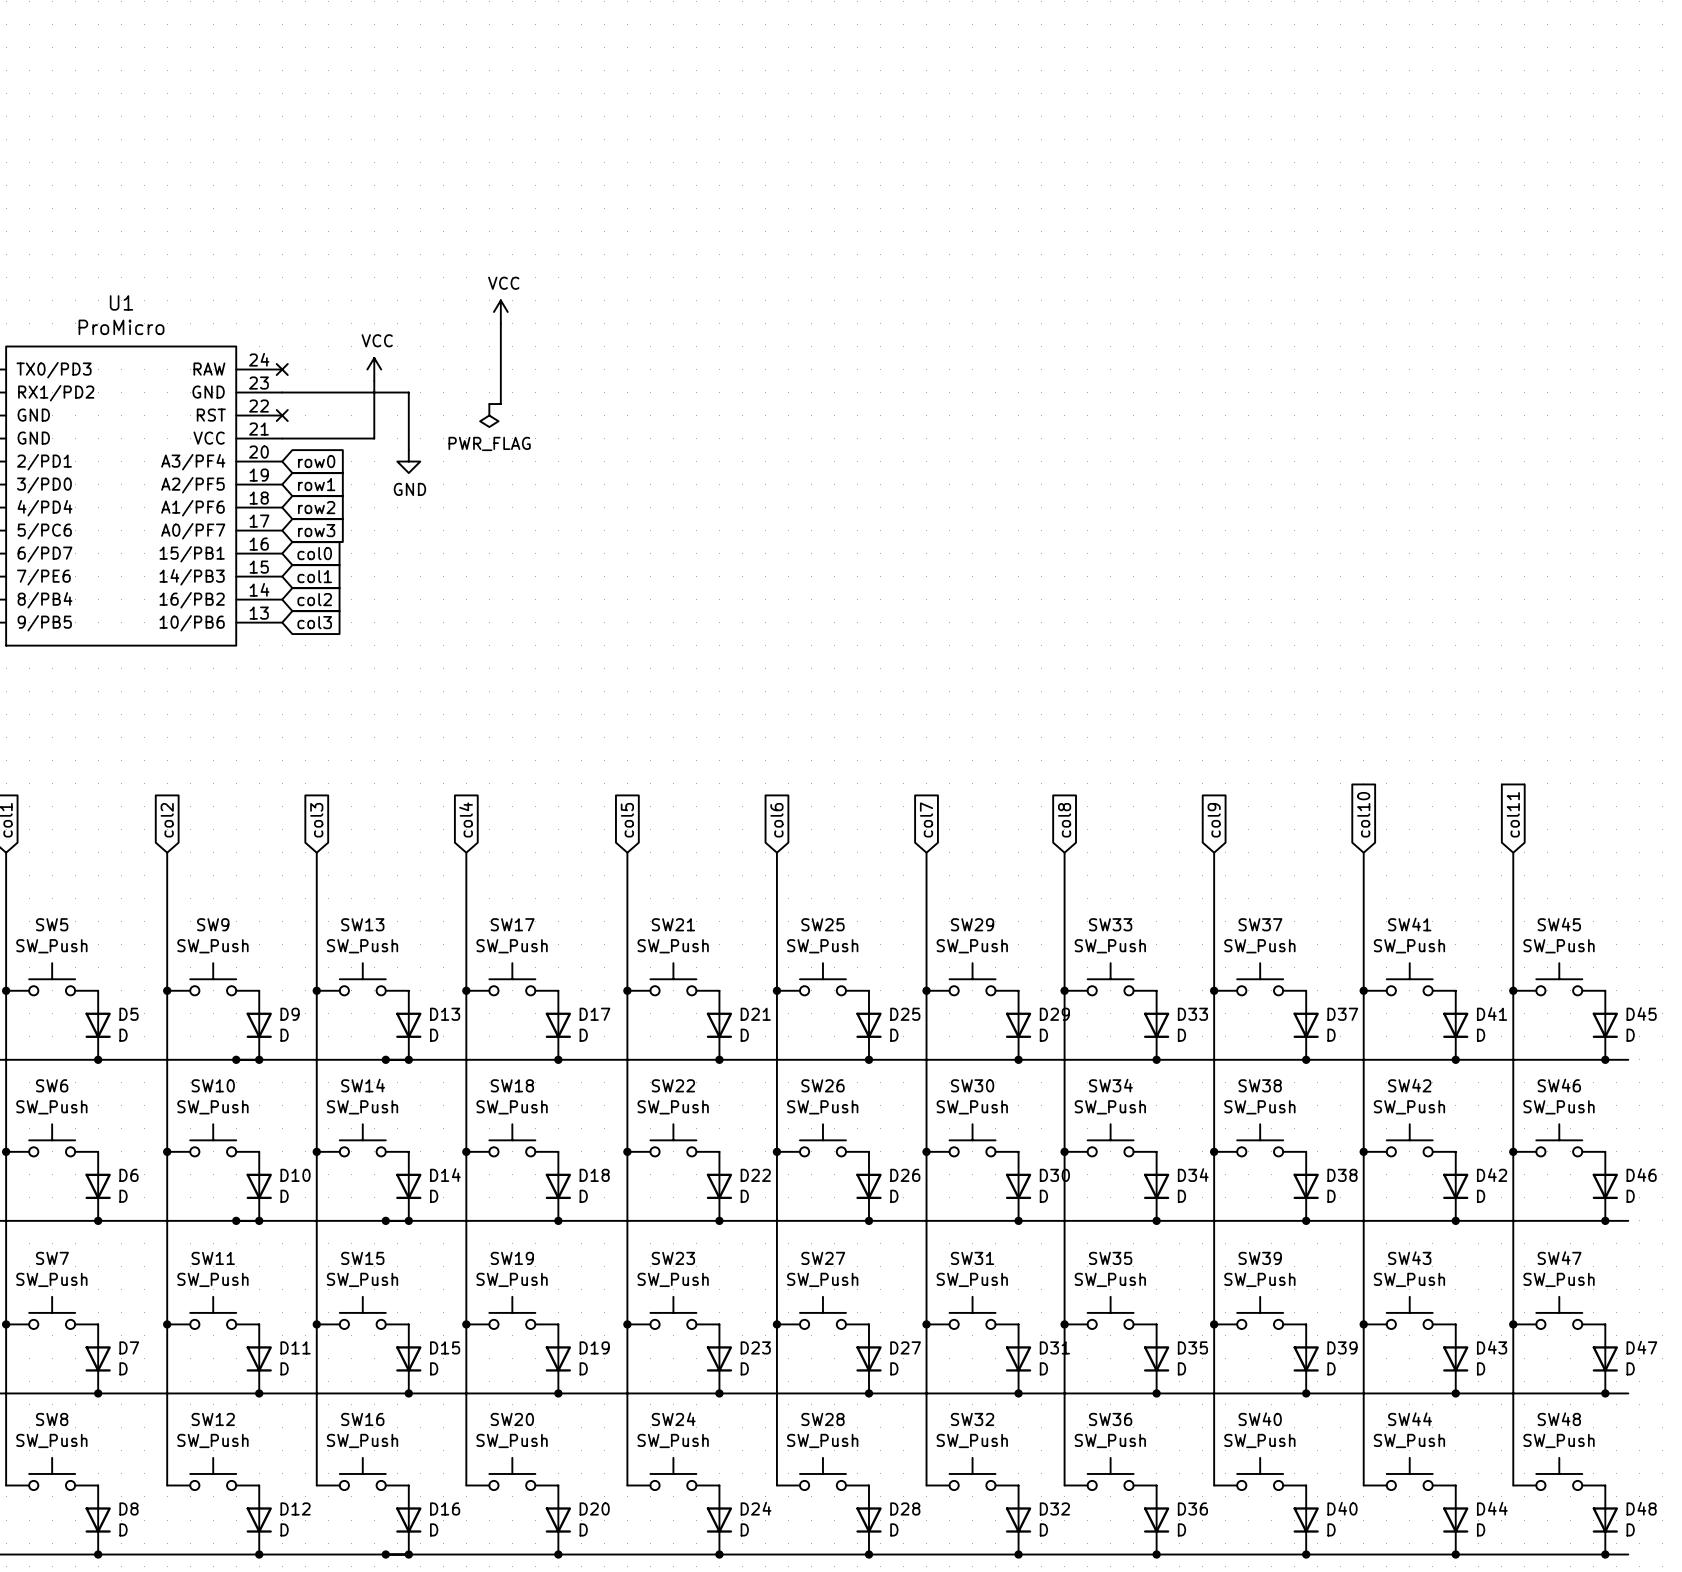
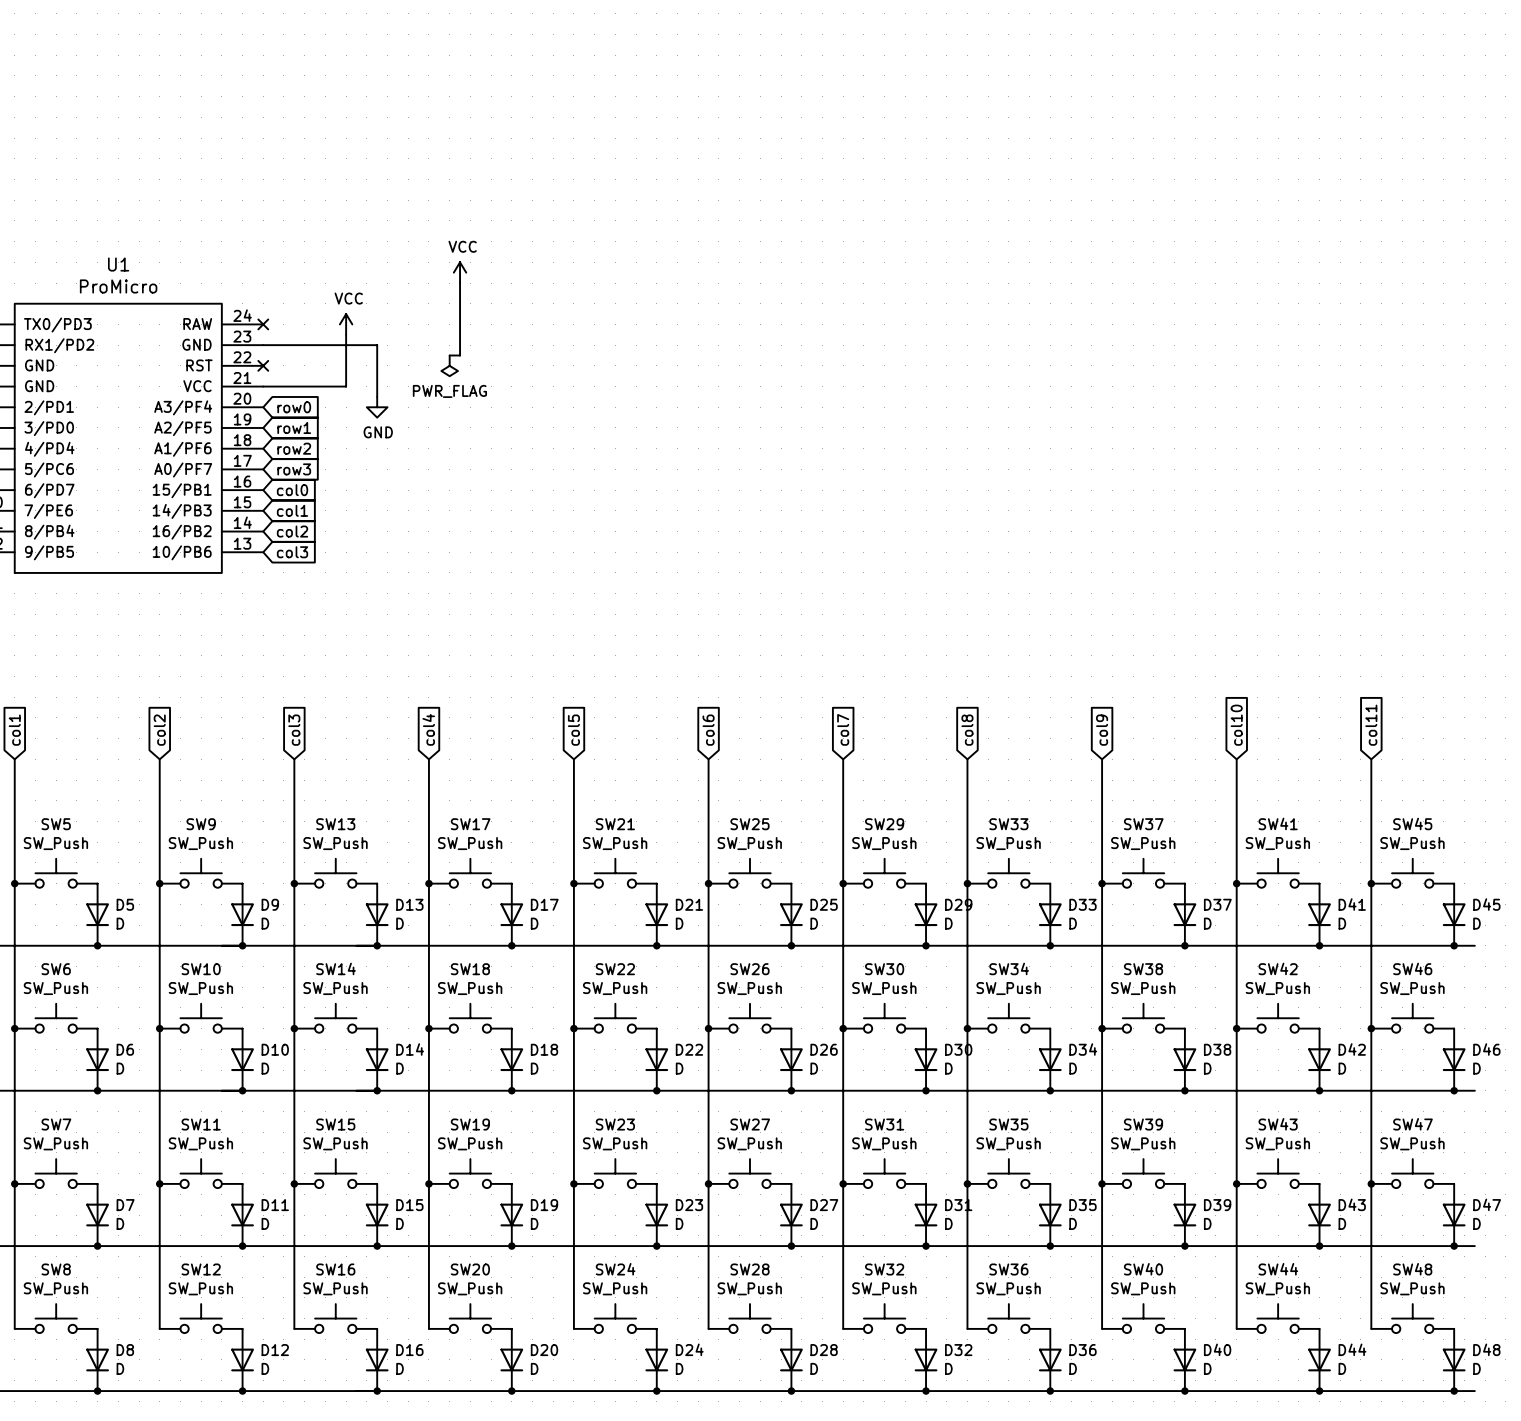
junction: (236, 1059) -> none
junction: (385, 1059) -> none
junction: (236, 1220) -> none
junction: (385, 1220) -> none
junction: (385, 1554) -> none

